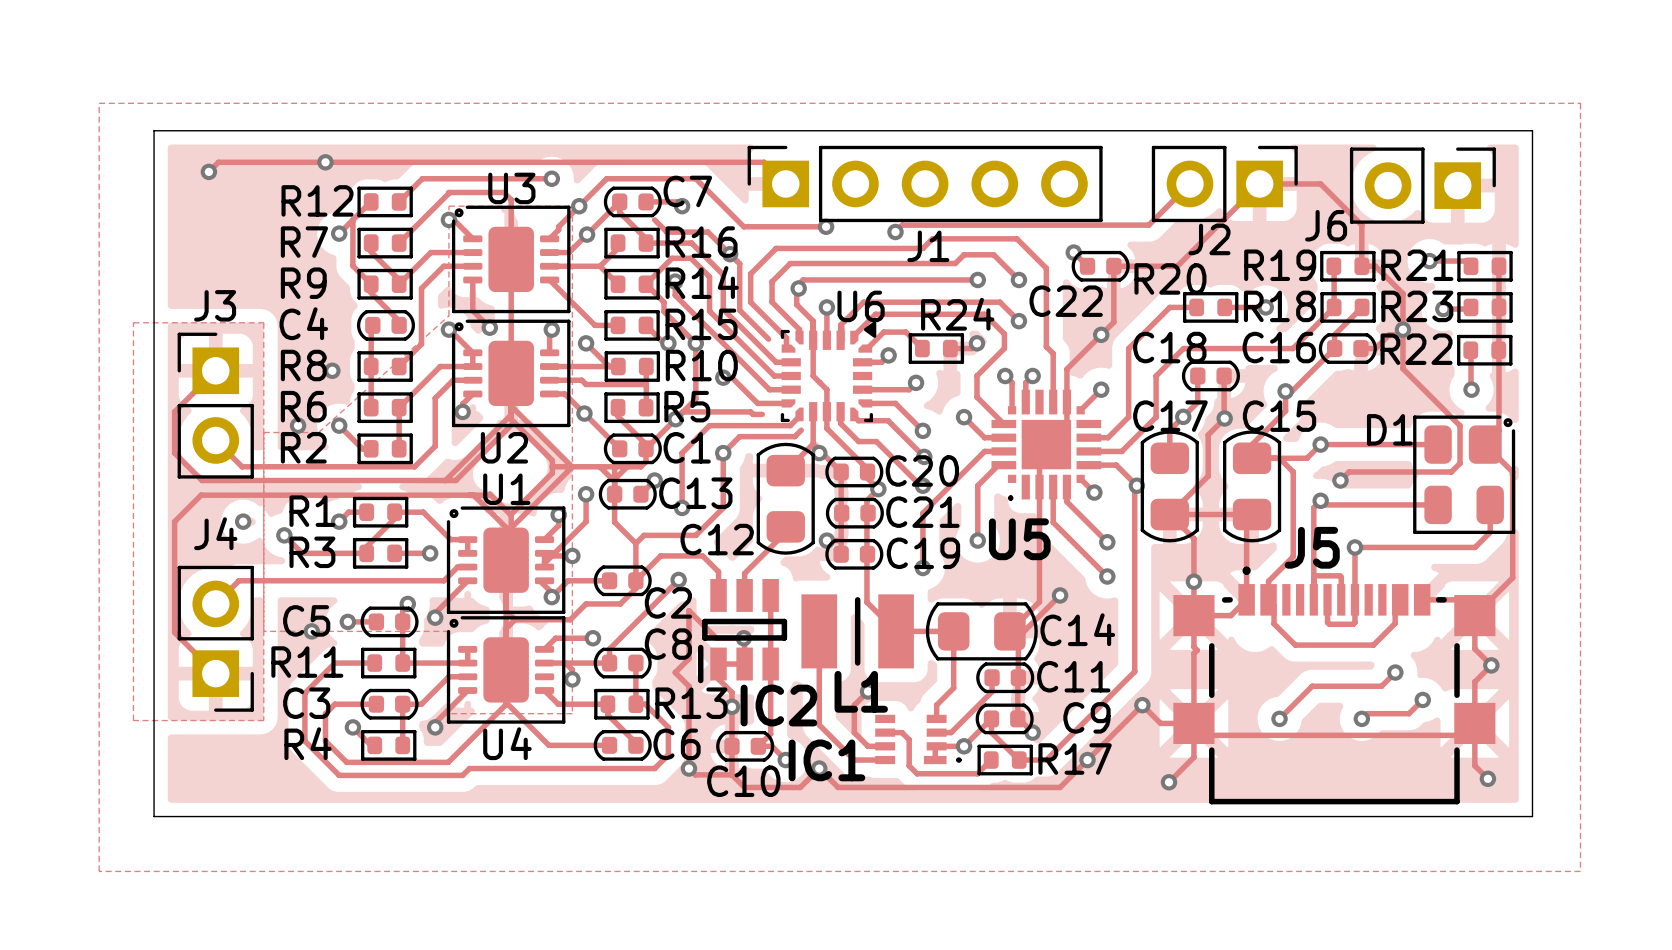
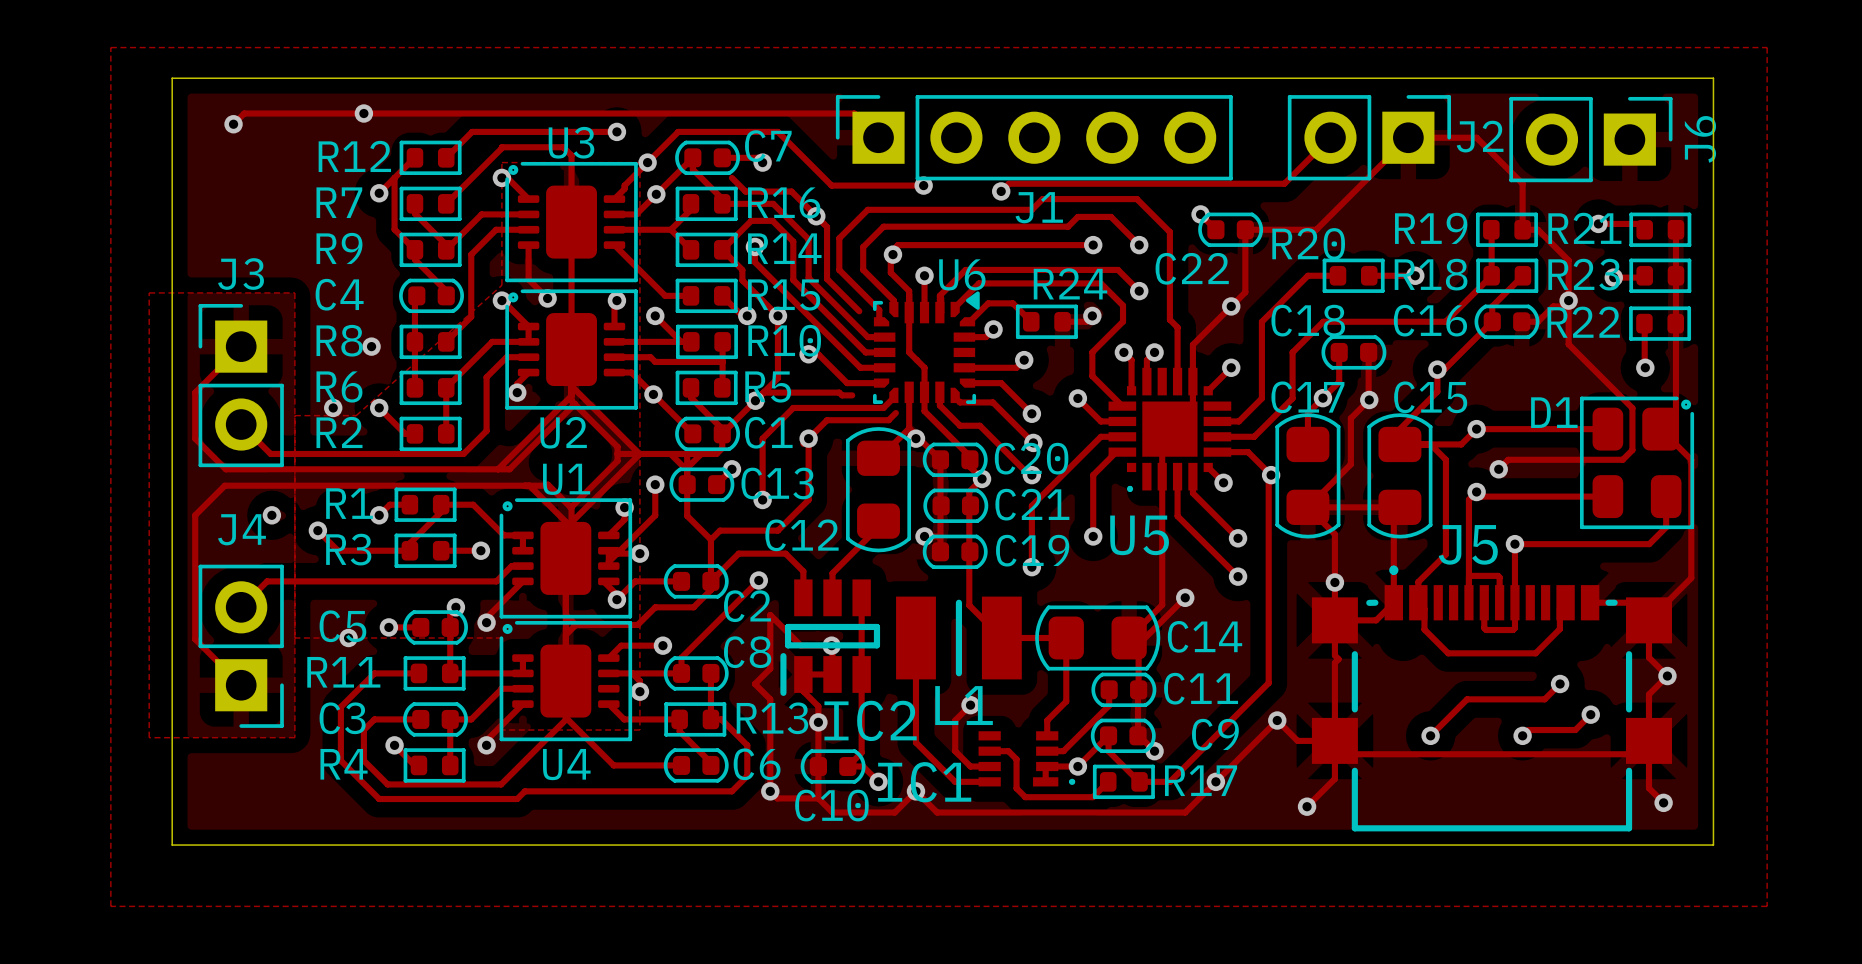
J6 name rotation: 0° (1326, 225) -> 90° counterclockwise (1700, 139)
J6 name position: J6 (1326, 225) -> J6 (1700, 139)
J2 name position: J2 (1209, 239) -> J2 (1480, 136)

